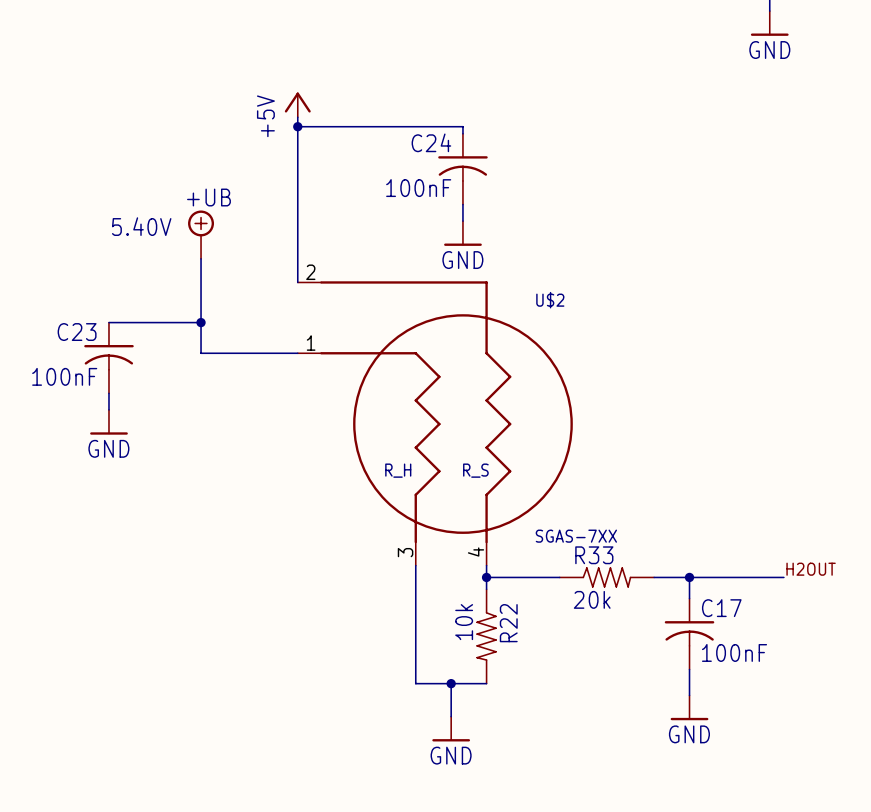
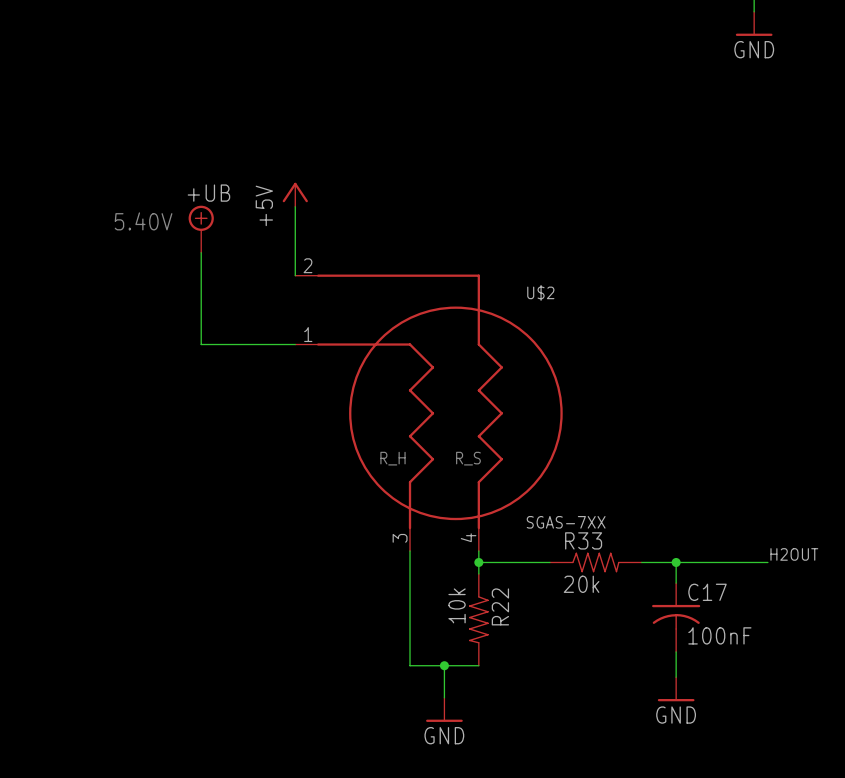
power symbol position: +5V (297, 104) -> +5V (295, 194)
wire: (297, 117) (297, 211) -> none
wire: (297, 126) (462, 126) (462, 133) -> none
junction: (297, 126) -> none
C24: 100nF (462, 169) -> none
wire: (462, 204) (462, 221) -> none
power symbol: GND (462, 233) -> none
wire: (108, 322) (201, 322) -> none
junction: (201, 322) -> none
C23: 100nF (108, 357) -> none
wire: (108, 393) (108, 409) -> none
power symbol: GND (108, 422) -> none

